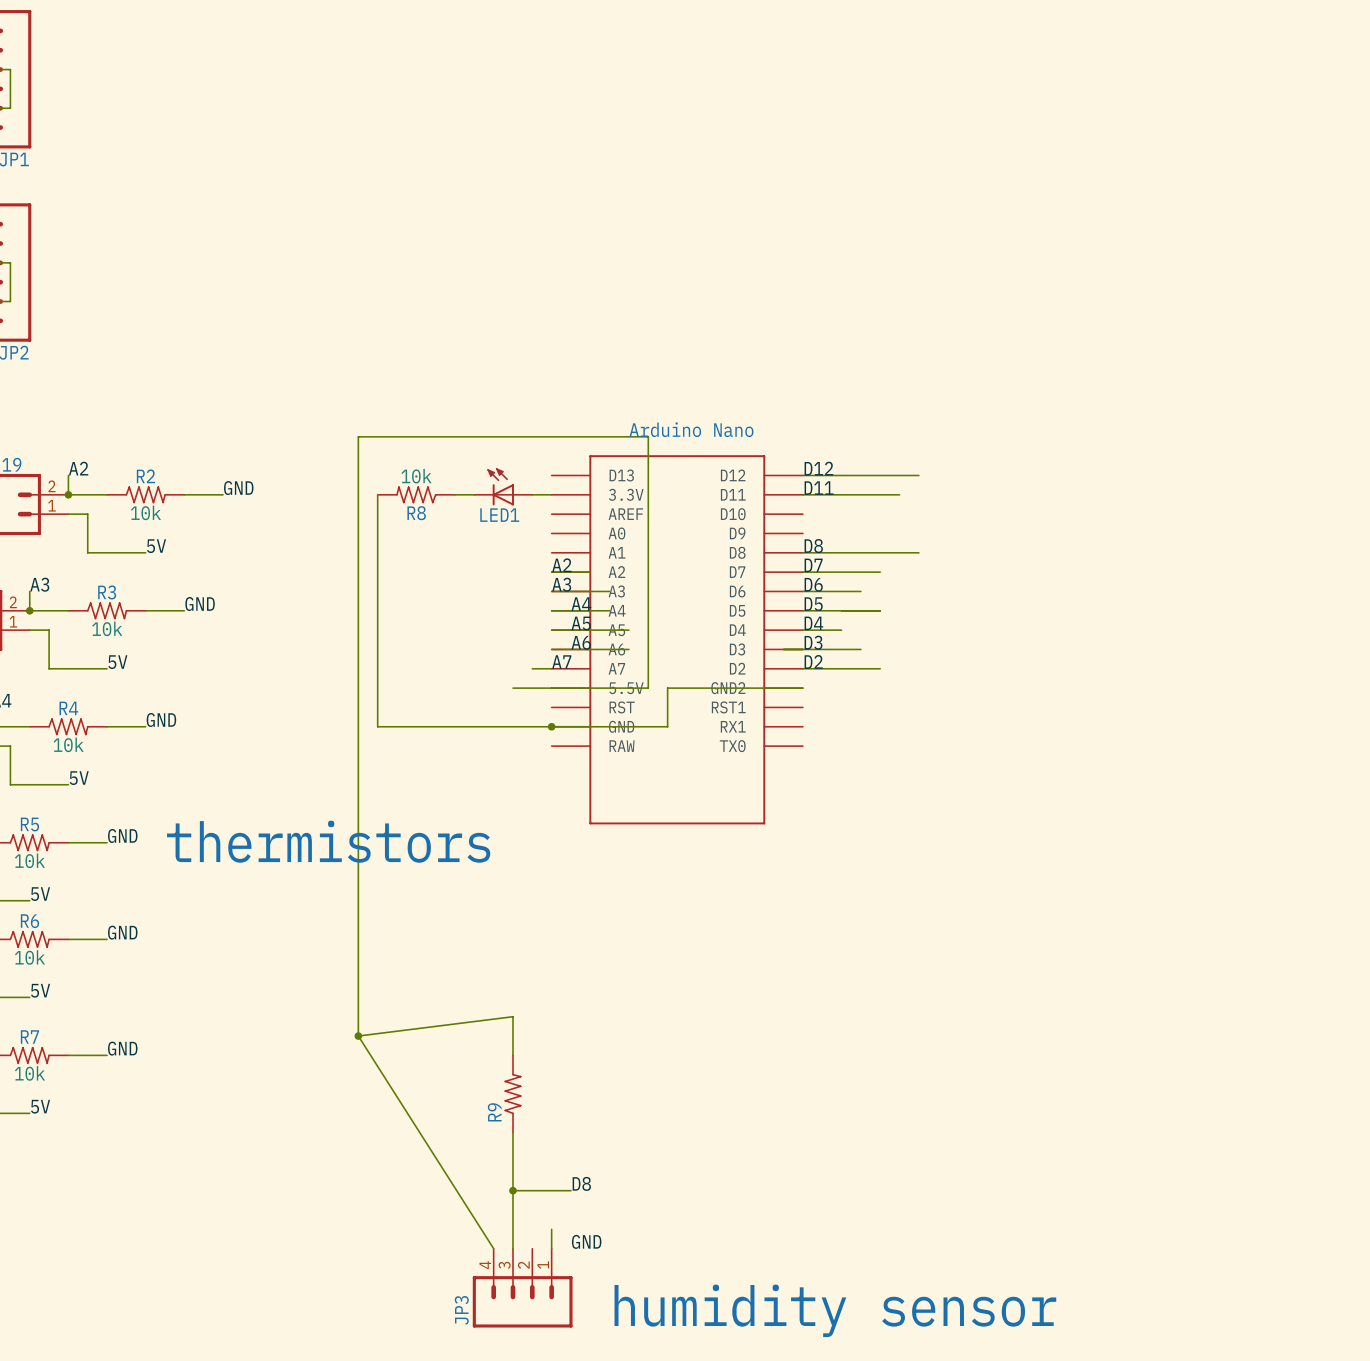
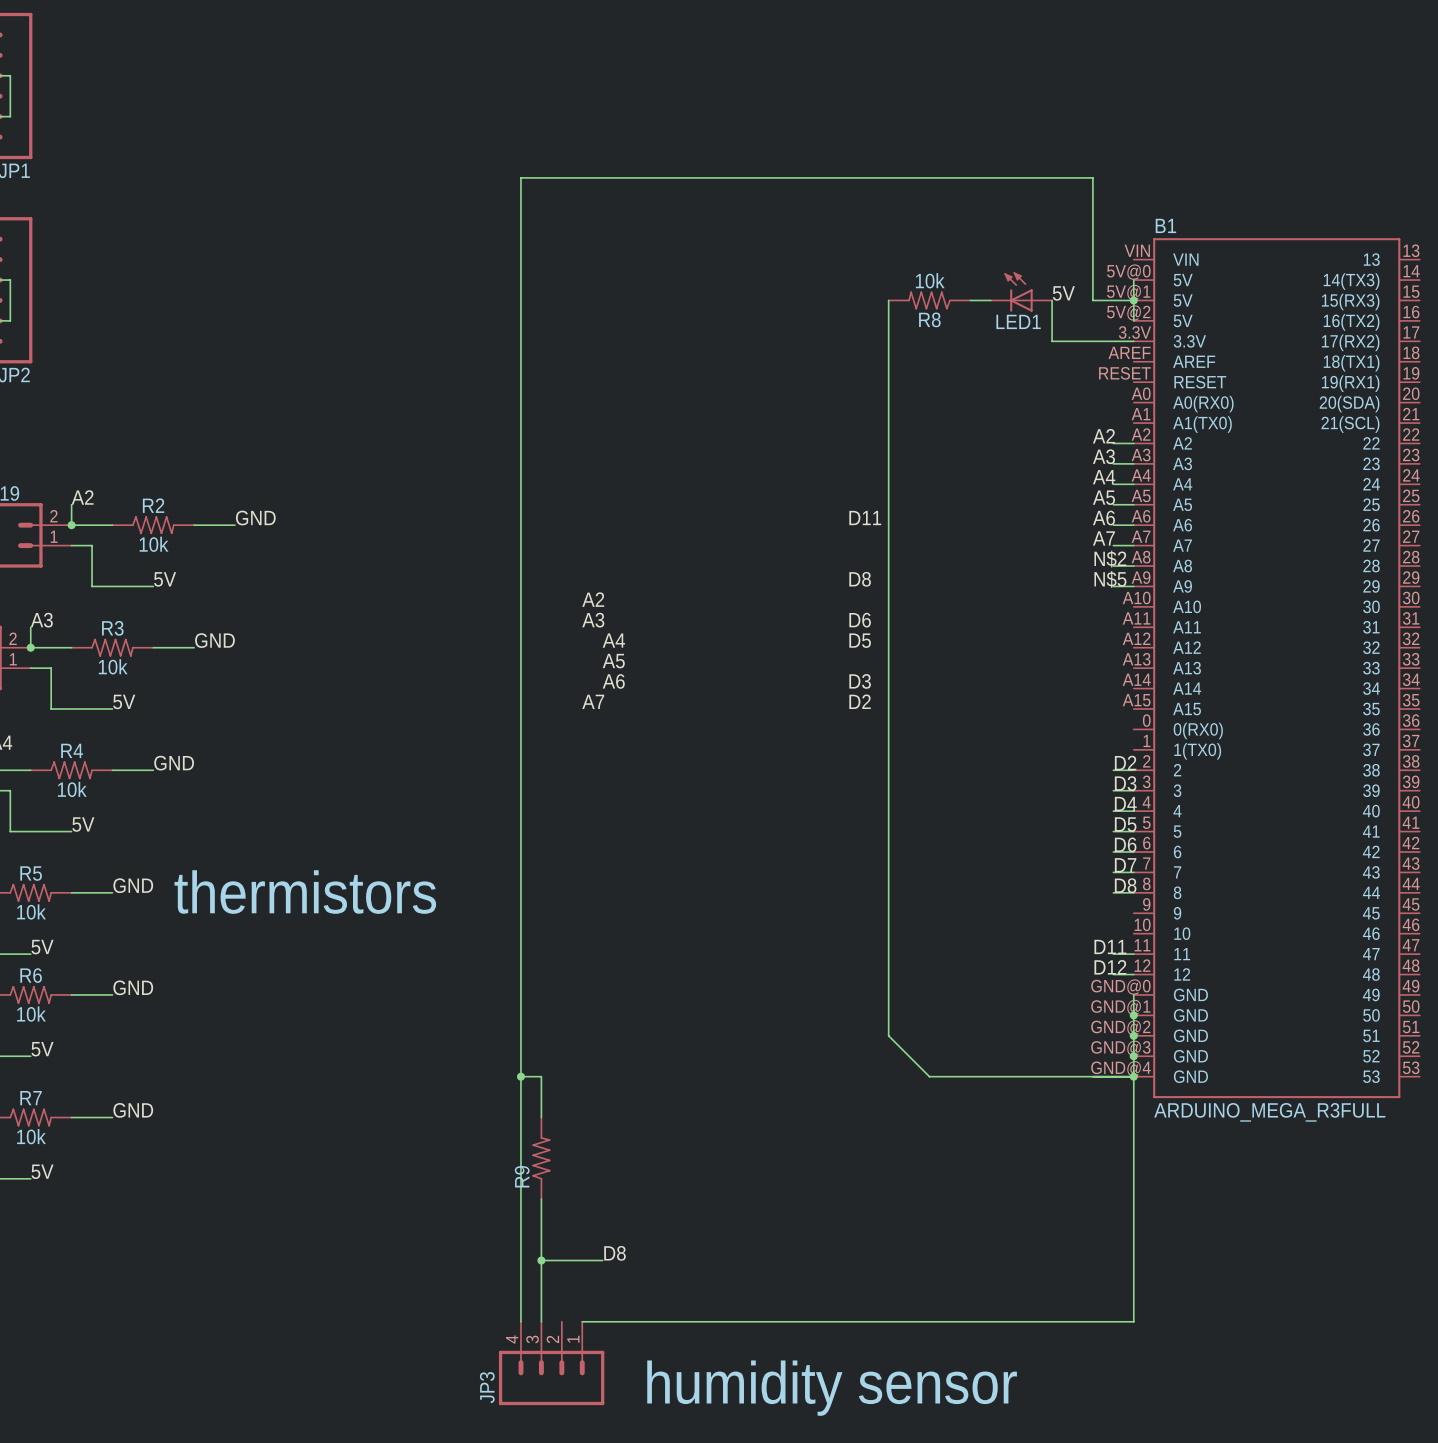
wire: none -> (1133, 280) (1133, 320)
label: none -> 5V (1063, 293)
wire: none -> (888, 300) (888, 1035) (929, 1076) (1133, 1076)
wire: none -> (970, 300) (990, 300)
wire: none -> (1052, 300) (1052, 341) (1133, 341)
junction: none -> (1133, 300)
label: none -> A2 (1103, 436)
wire: none -> (1113, 443) (1133, 443)
label: none -> A3 (1103, 456)
wire: none -> (1113, 463) (1133, 463)
label: none -> A4 (1104, 477)
wire: none -> (1113, 484) (1133, 484)
label: D12 (818, 468) -> none
label: none -> A5 (1103, 497)
wire: (802, 475) (918, 475) -> none
wire: none -> (1113, 504) (1133, 504)
LED1 position: (503, 486) -> (1021, 292)
label: none -> A6 (1103, 518)
wire: (377, 494) (377, 726) (667, 726) (667, 688) (802, 688) -> none
R8 position: (416, 494) -> (929, 300)
wire: (455, 494) (474, 494) -> none
wire: (532, 494) (551, 494) -> none
wire: (802, 494) (899, 494) -> none
wire: none -> (1113, 525) (1133, 525)
label: none -> A7 (1103, 538)
wire: none -> (1113, 545) (1133, 545)
label: none -> N$2 (1110, 559)
wire: none -> (1113, 566) (1133, 566)
label: none -> N$5 (1110, 579)
wire: (802, 552) (918, 552) -> none
wire: none -> (1113, 586) (1133, 586)
label: D7 (813, 565) -> none
wire: (551, 572) (590, 572) -> none
wire: (802, 572) (880, 572) -> none
wire: (551, 591) (609, 591) -> none
wire: (802, 591) (860, 591) -> none
wire: (551, 610) (609, 610) -> none
wire: (802, 610) (880, 610) -> none
label: D4 (813, 623) -> none
wire: (551, 630) (628, 630) -> none
wire: (802, 630) (841, 630) -> none
B1: none -> ARDUINO_MEGA_R3FULL (1276, 668)
part: (677, 639) -> none
wire: (551, 649) (628, 649) -> none
wire: (783, 649) (860, 649) -> none
wire: (532, 668) (551, 668) -> none
wire: (802, 668) (880, 668) -> none
wire: (512, 688) (648, 688) (648, 436) (358, 436) (358, 1036) -> none
label: none -> D2 (1125, 763)
junction: (551, 726) -> none
wire: none -> (1113, 770) (1133, 770)
label: none -> D3 (1125, 783)
wire: none -> (1113, 790) (1133, 790)
label: none -> D4 (1125, 803)
wire: none -> (1113, 811) (1133, 811)
label: none -> D5 (1125, 824)
wire: none -> (1113, 831) (1133, 831)
label: none -> D6 (1125, 844)
wire: none -> (1113, 851) (1133, 851)
label: none -> D7 (1125, 865)
wire: none -> (1113, 872) (1133, 872)
label: none -> D8 (1125, 885)
wire: none -> (1113, 892) (1133, 892)
label: none -> D11 (1110, 946)
wire: none -> (1113, 954) (1133, 954)
label: none -> D12 (1110, 967)
wire: none -> (1113, 974) (1133, 974)
junction: none -> (1133, 1015)
junction: none -> (1133, 1035)
junction: none -> (1133, 1056)
junction: none -> (520, 1076)
wire: (512, 1016) (358, 1036) -> (541, 1076) (520, 1076)
junction: none -> (1133, 1076)
wire: (358, 1036) (493, 1248) -> (1133, 300) (1092, 300) (1092, 177) (520, 177) (520, 1321)
junction: (358, 1036) -> none
wire: (551, 1229) (551, 1248) -> (1133, 994) (1133, 1321) (582, 1321)
label: GND (586, 1241) -> none

